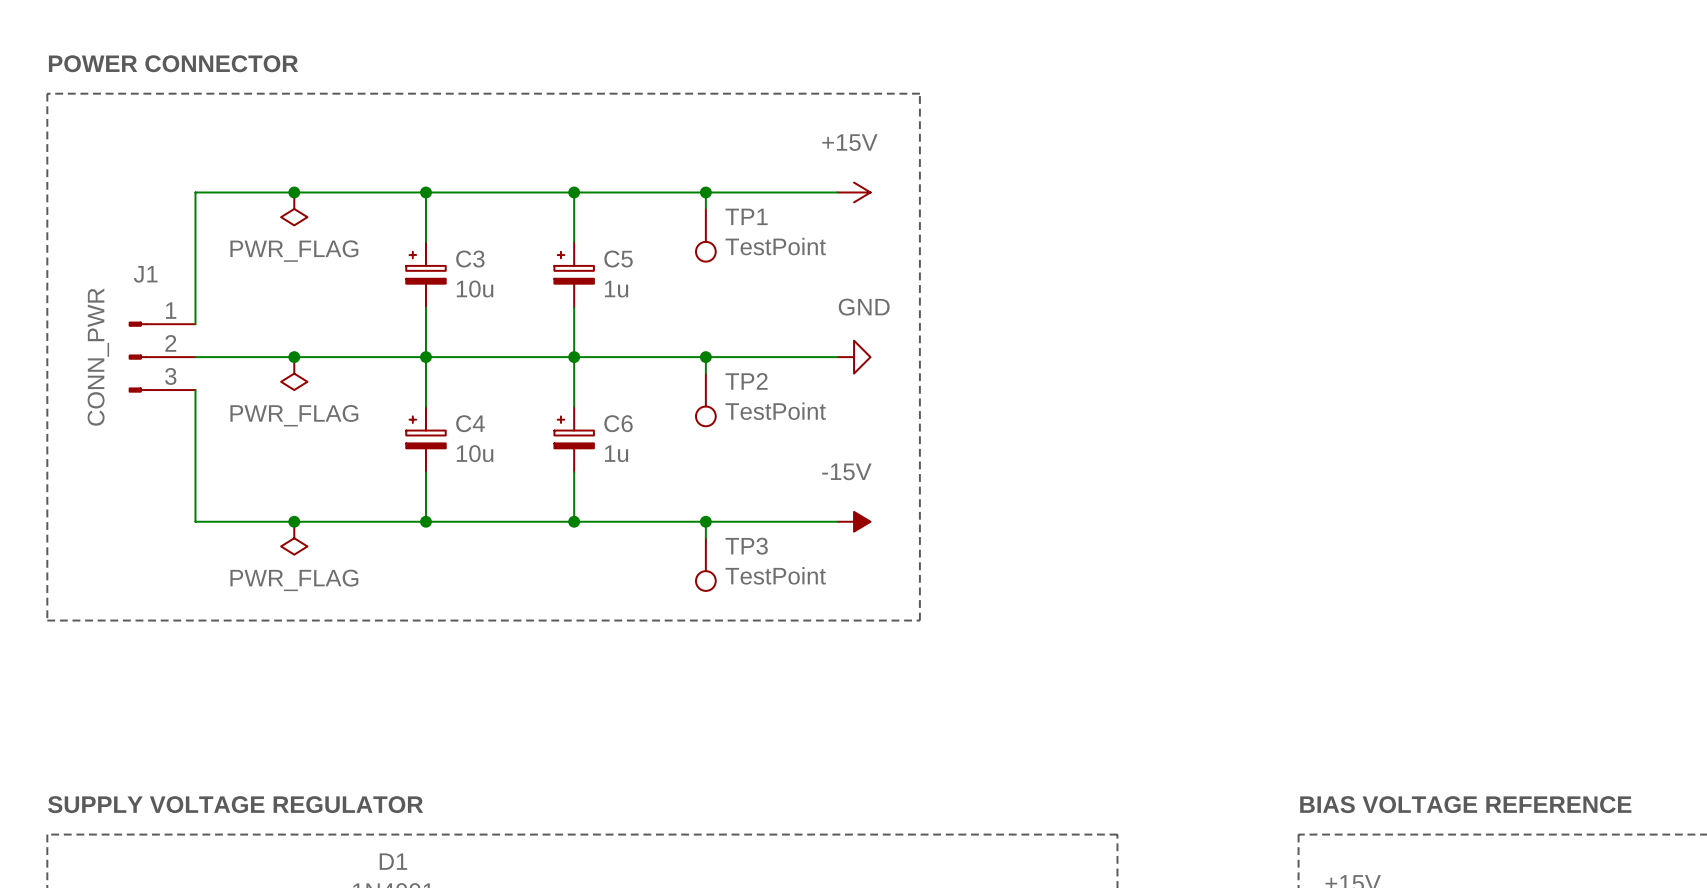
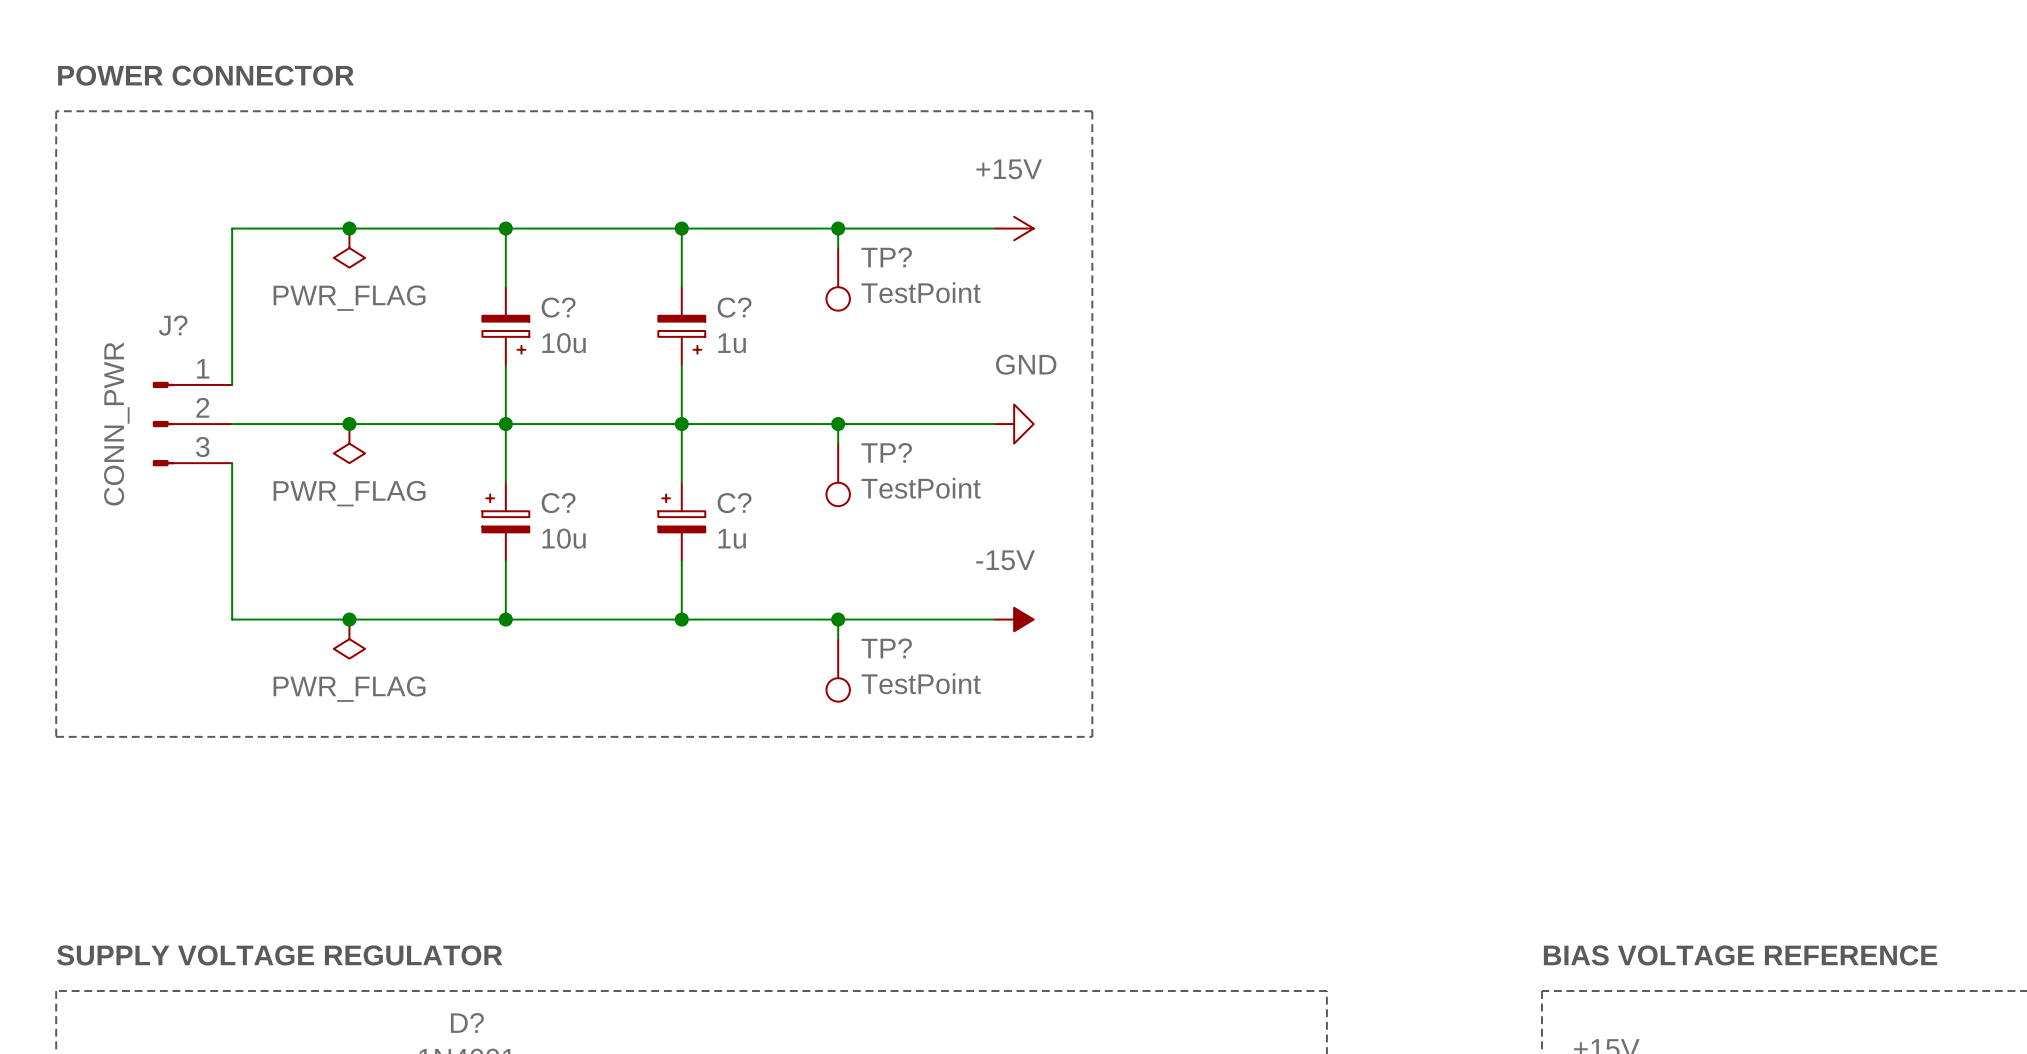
TP1 name: TP1 (746, 216) -> TP? (886, 257)
J1 name: J1 (145, 274) -> J? (173, 325)
C3: 10u (425, 274) -> none
C?: none -> 10u (505, 326)
C5: 1u (574, 274) -> none
C?: none -> 1u (681, 326)
TP2 name: TP2 (746, 381) -> TP? (886, 452)
C4 name: C4 (470, 423) -> C? (558, 503)
C6 name: C6 (618, 423) -> C? (734, 503)
TP3 name: TP3 (746, 546) -> TP? (886, 648)
D1 name: D1 (393, 861) -> D? (467, 1022)

